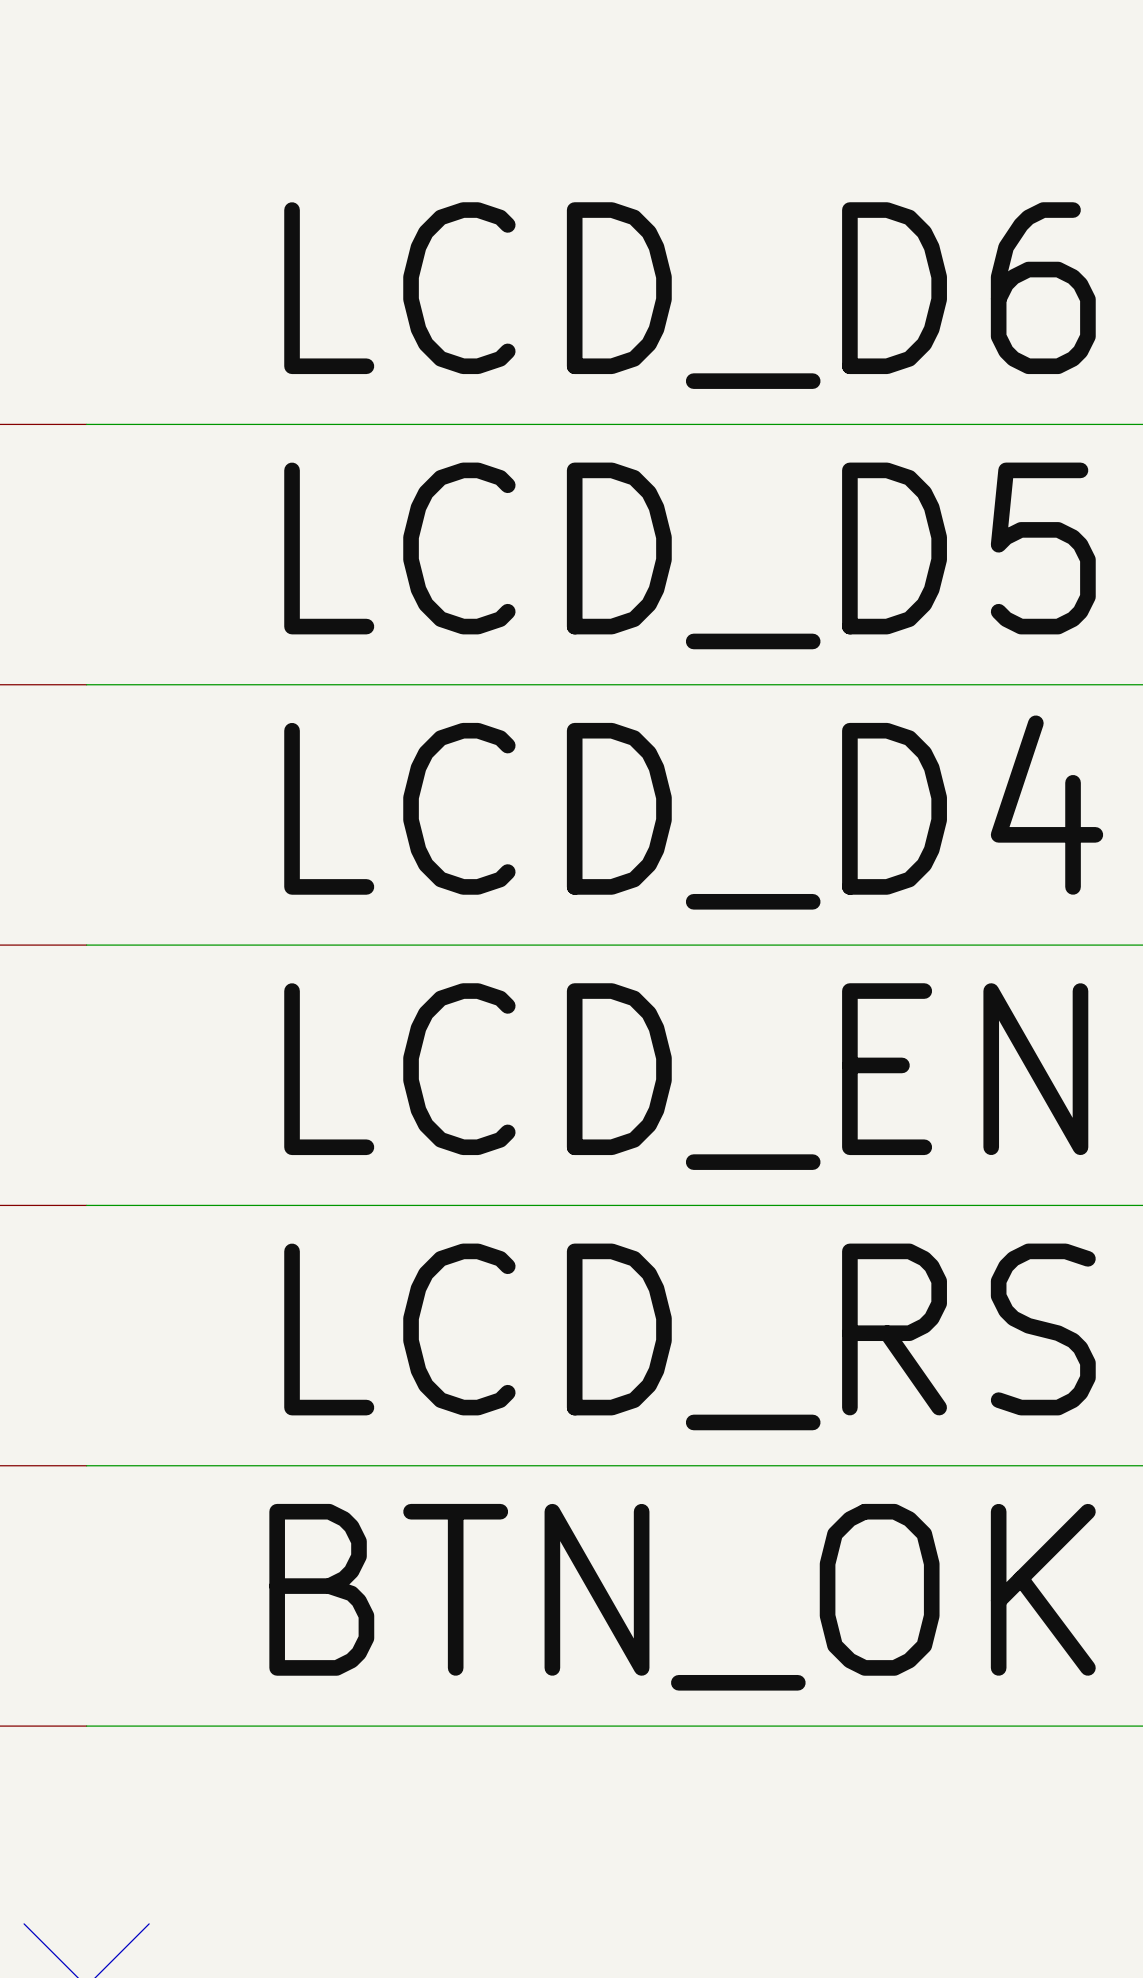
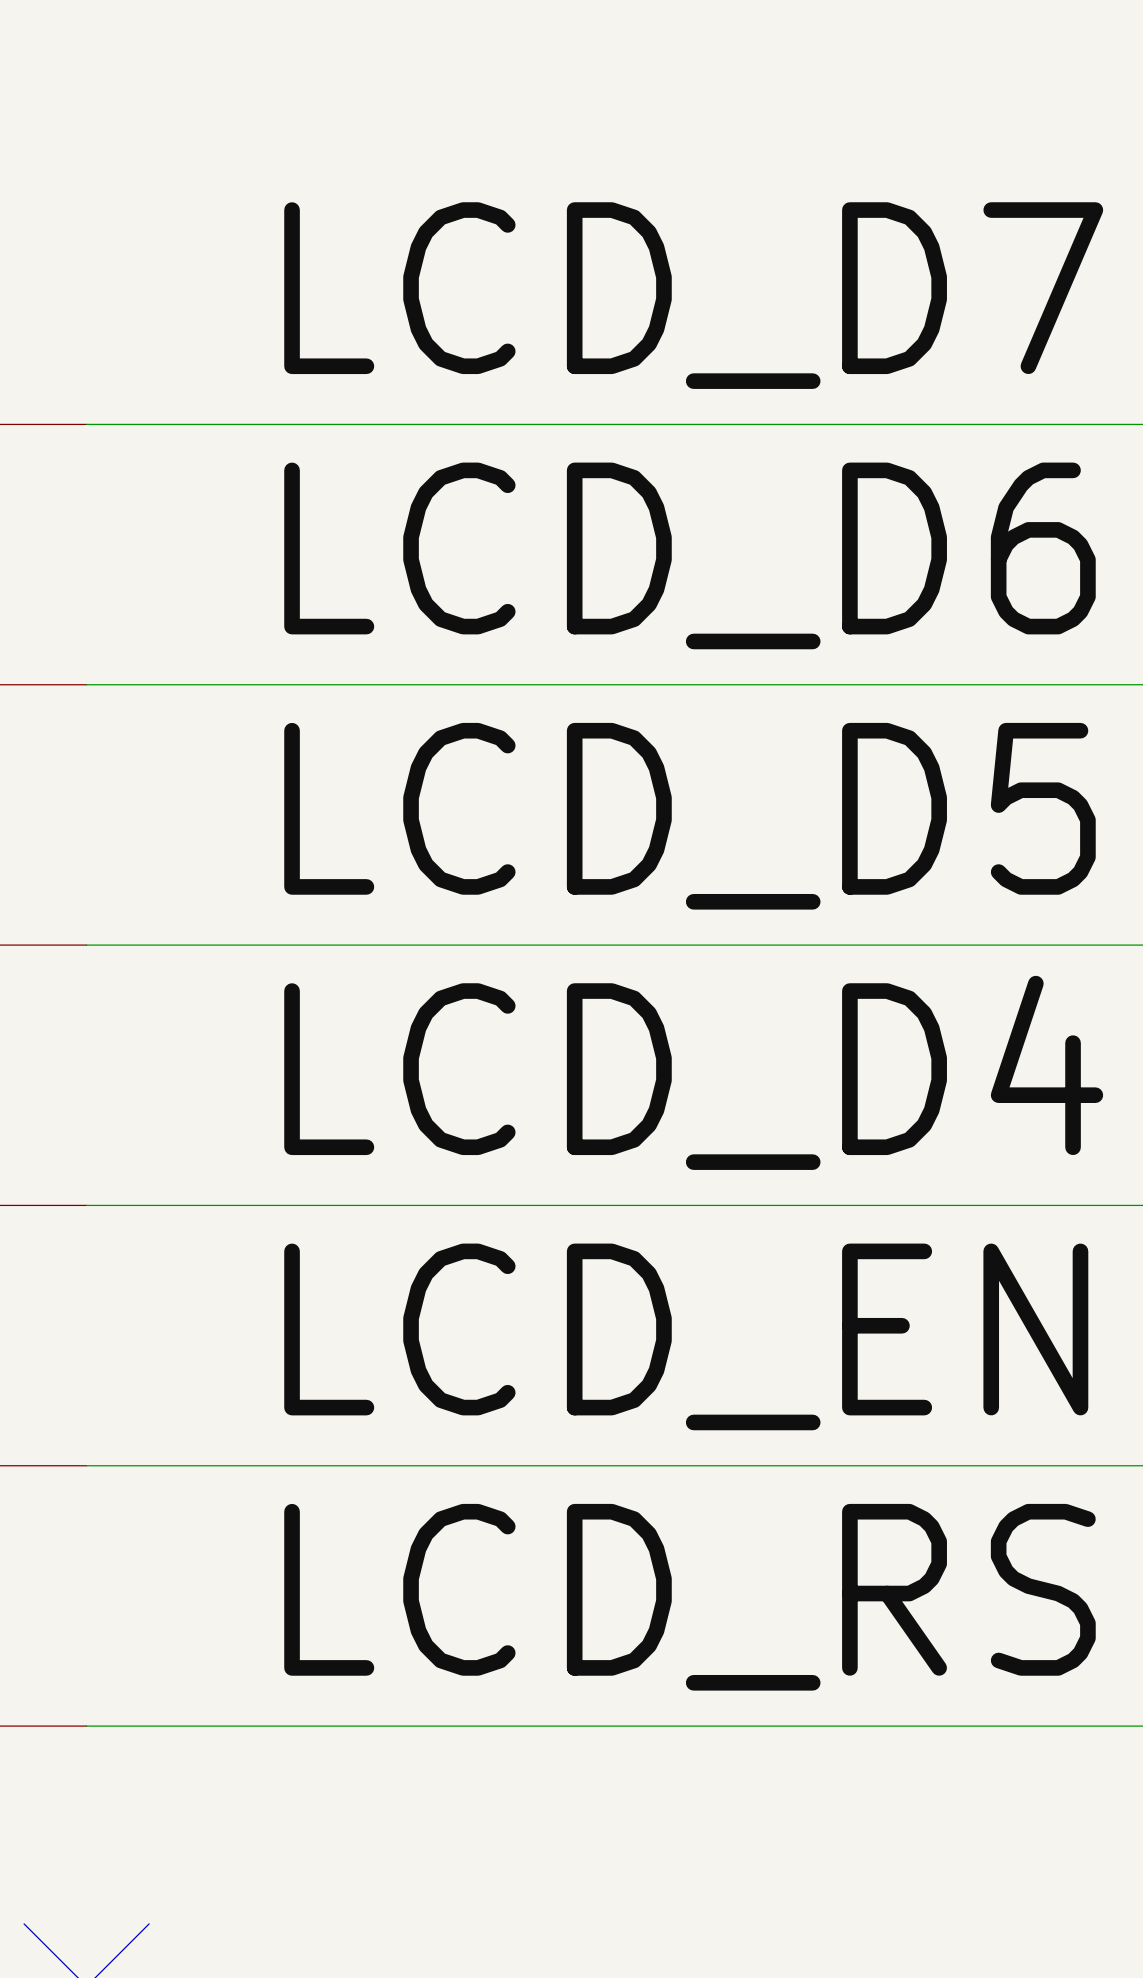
label: LCD_D6 (689, 295) -> LCD_D7 (693, 295)
label: LCD_D5 (689, 555) -> LCD_D6 (689, 555)
label: LCD_D4 (693, 812) -> LCD_D5 (689, 816)
label: LCD_EN (686, 1076) -> LCD_D4 (693, 1072)
label: LCD_RS (689, 1336) -> LCD_EN (686, 1336)
label: BTN_OK (682, 1597) -> LCD_RS (689, 1597)

